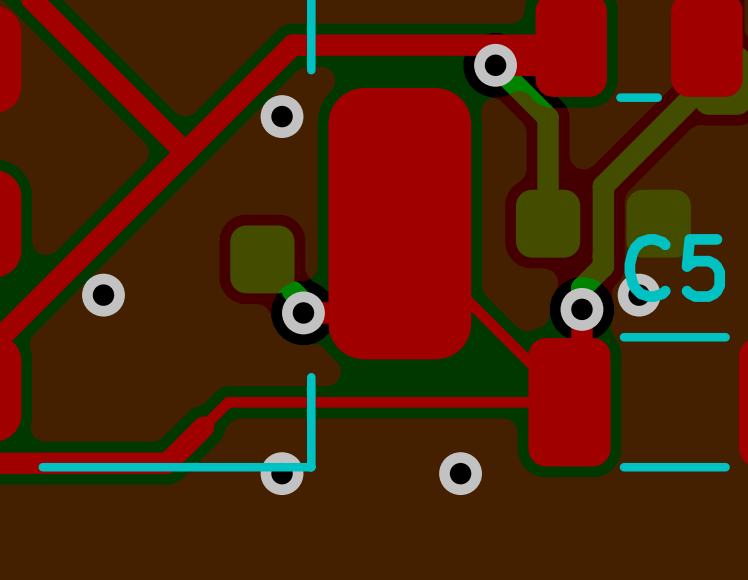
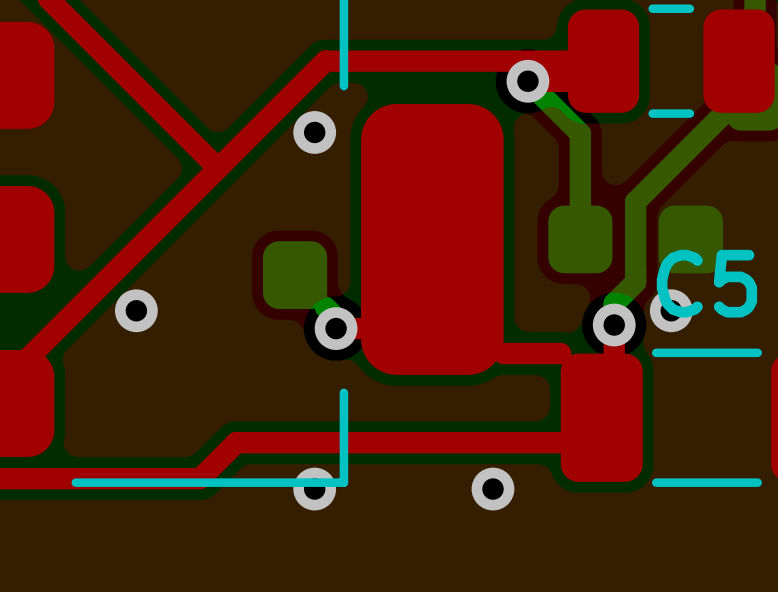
top track: (399, 223) (399, 232) (569, 402) (228, 402) (203, 427) -> (560, 442) (236, 442)
top track: none -> (503, 353) (560, 353)

